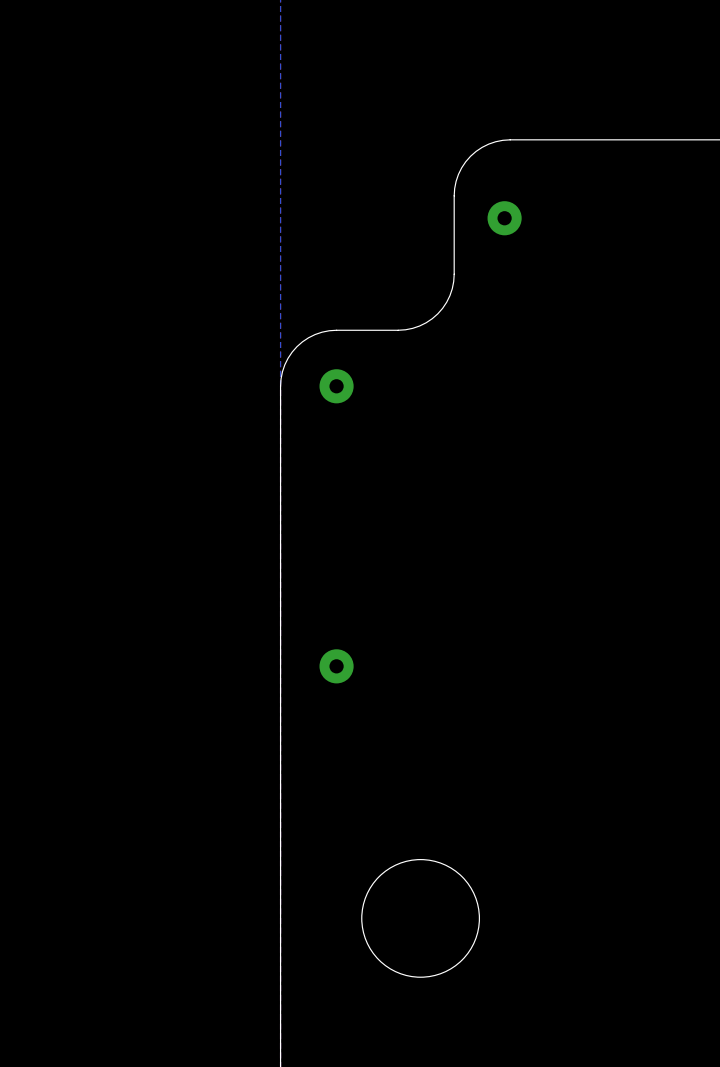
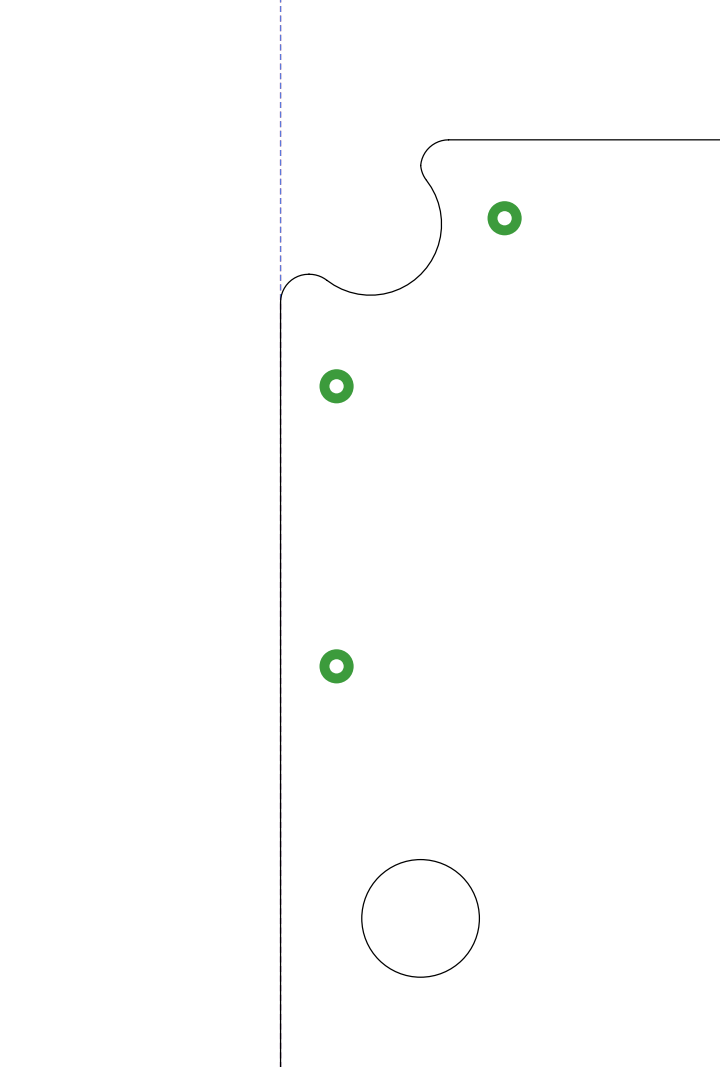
board edge: (510, 139) (488, 144) (476, 151) (465, 161) (458, 174) (454, 195) (453, 281) (449, 295) (437, 313) (419, 326) (405, 329) (336, 330) (315, 334) (302, 341) (292, 352) (284, 364) (280, 386) -> (510, 139) (445, 140) (432, 145) (425, 152) (421, 168) (438, 202) (441, 219) (440, 236) (431, 260) (420, 274) (407, 284) (391, 291) (366, 295) (349, 292) (321, 277) (309, 274)
board edge: none -> (308, 274) (291, 280) (281, 295) (280, 386)

